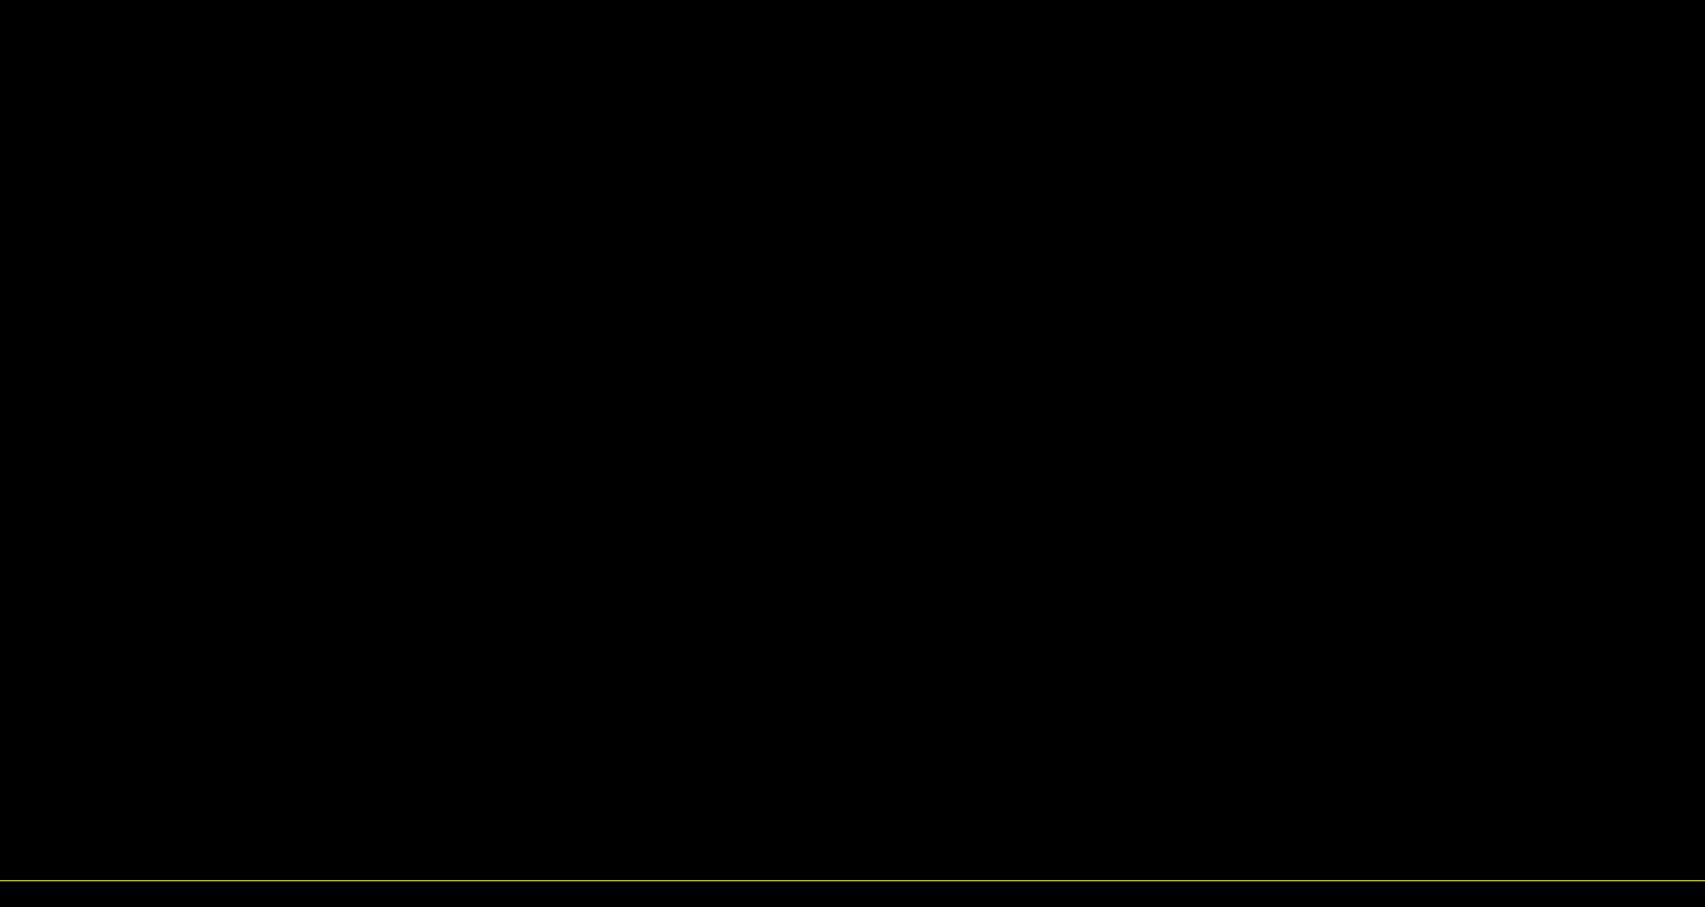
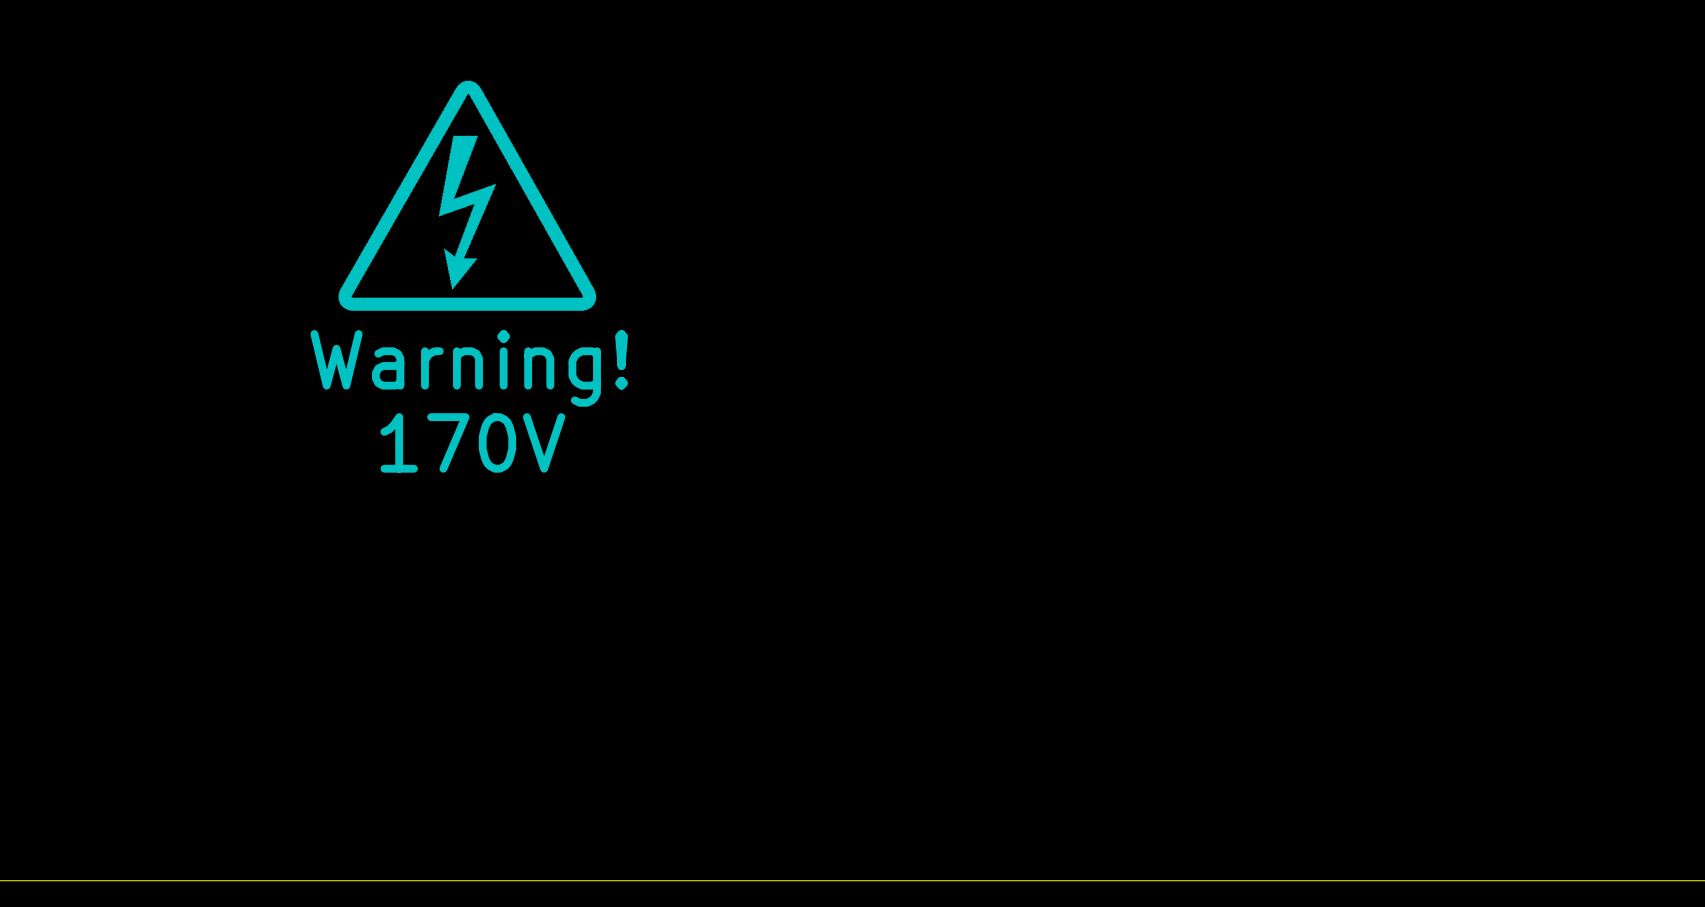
drawing: none -> [338, 80, 597, 311]
text: none -> Warning! (469, 368)
text: none -> 170V (472, 442)

